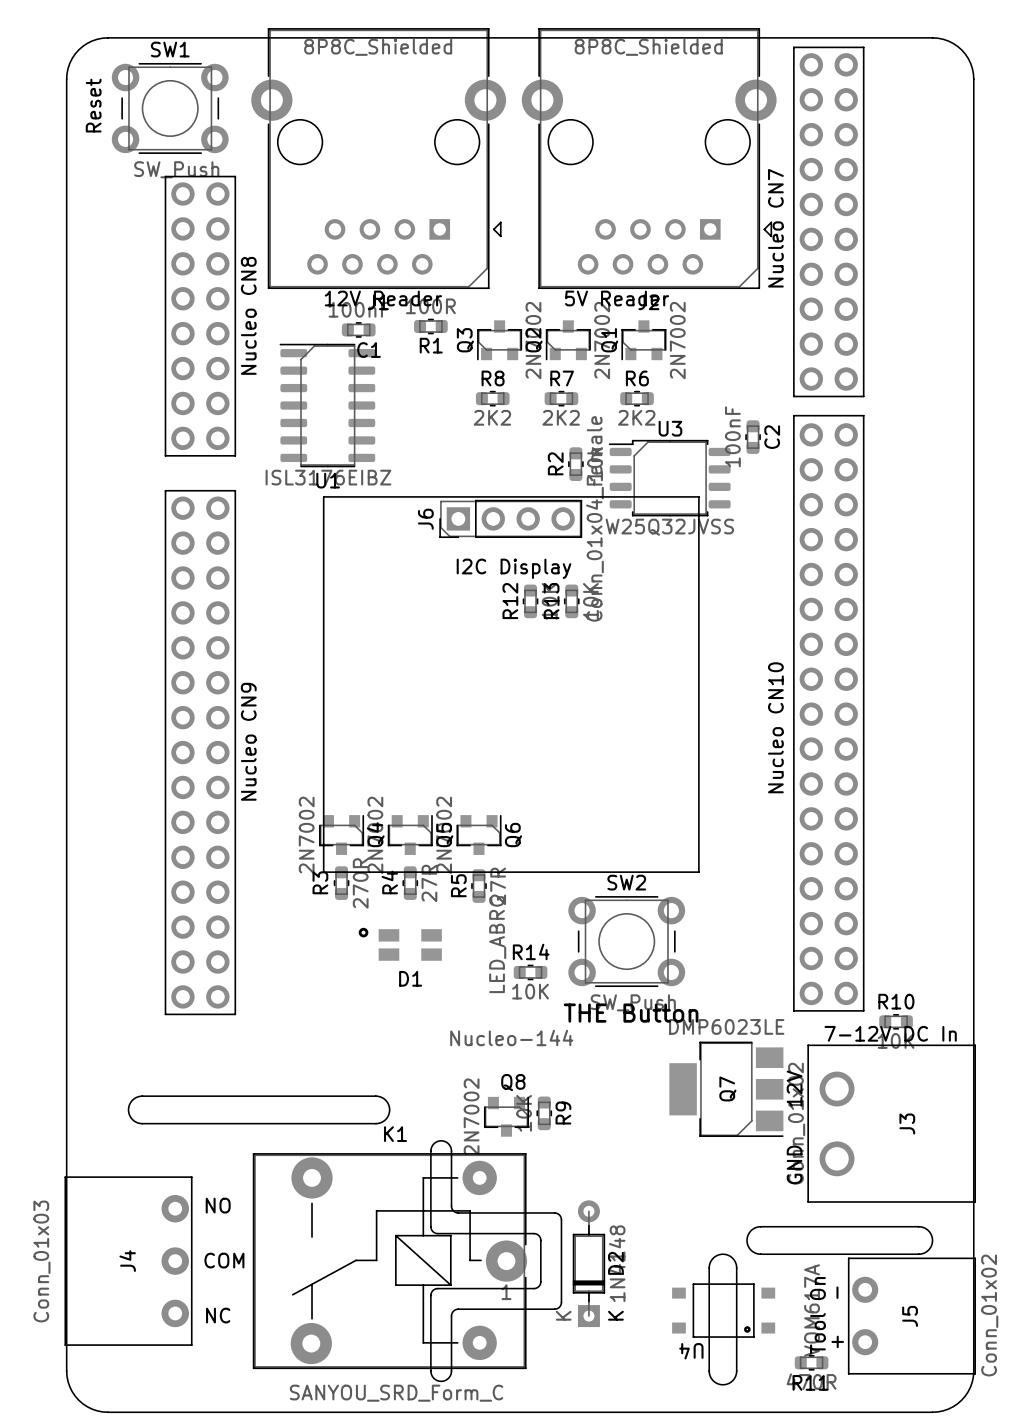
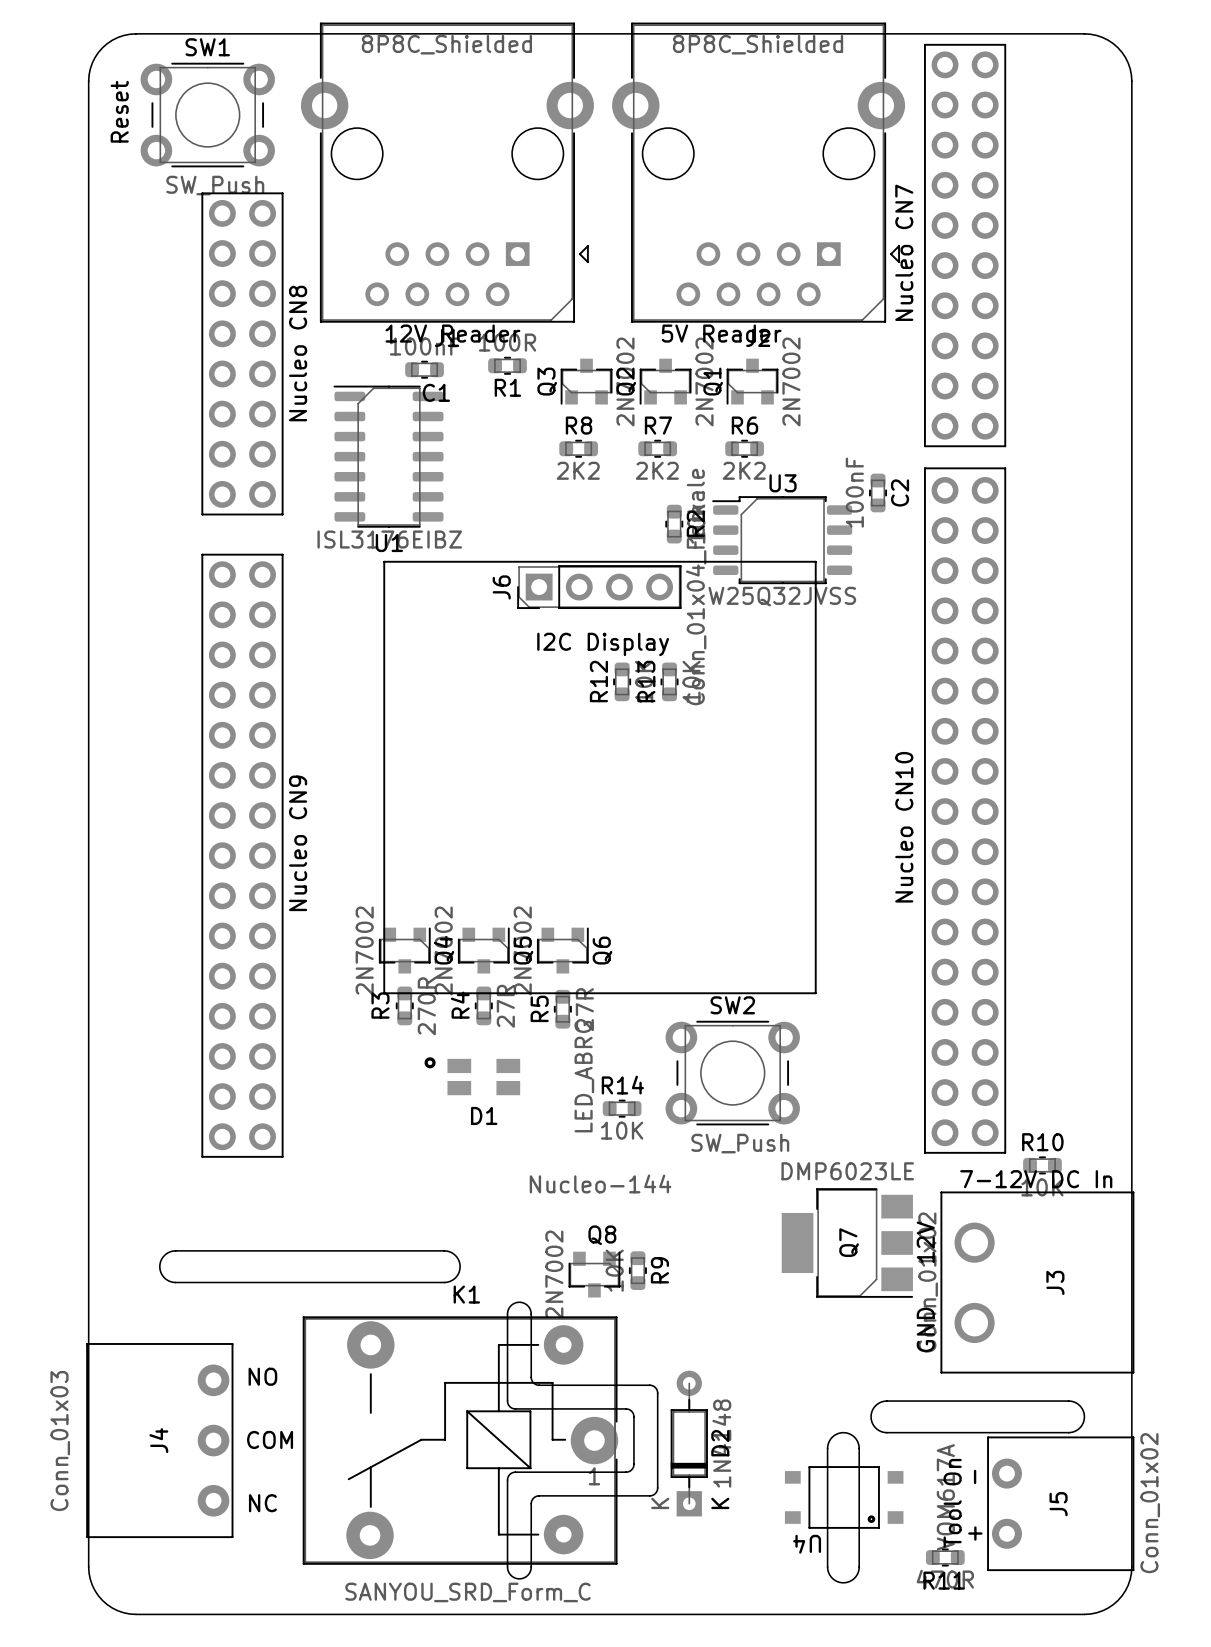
R2 name position: R2 (555, 463) -> R2 (695, 523)
text: THE Button (631, 1013) -> none

